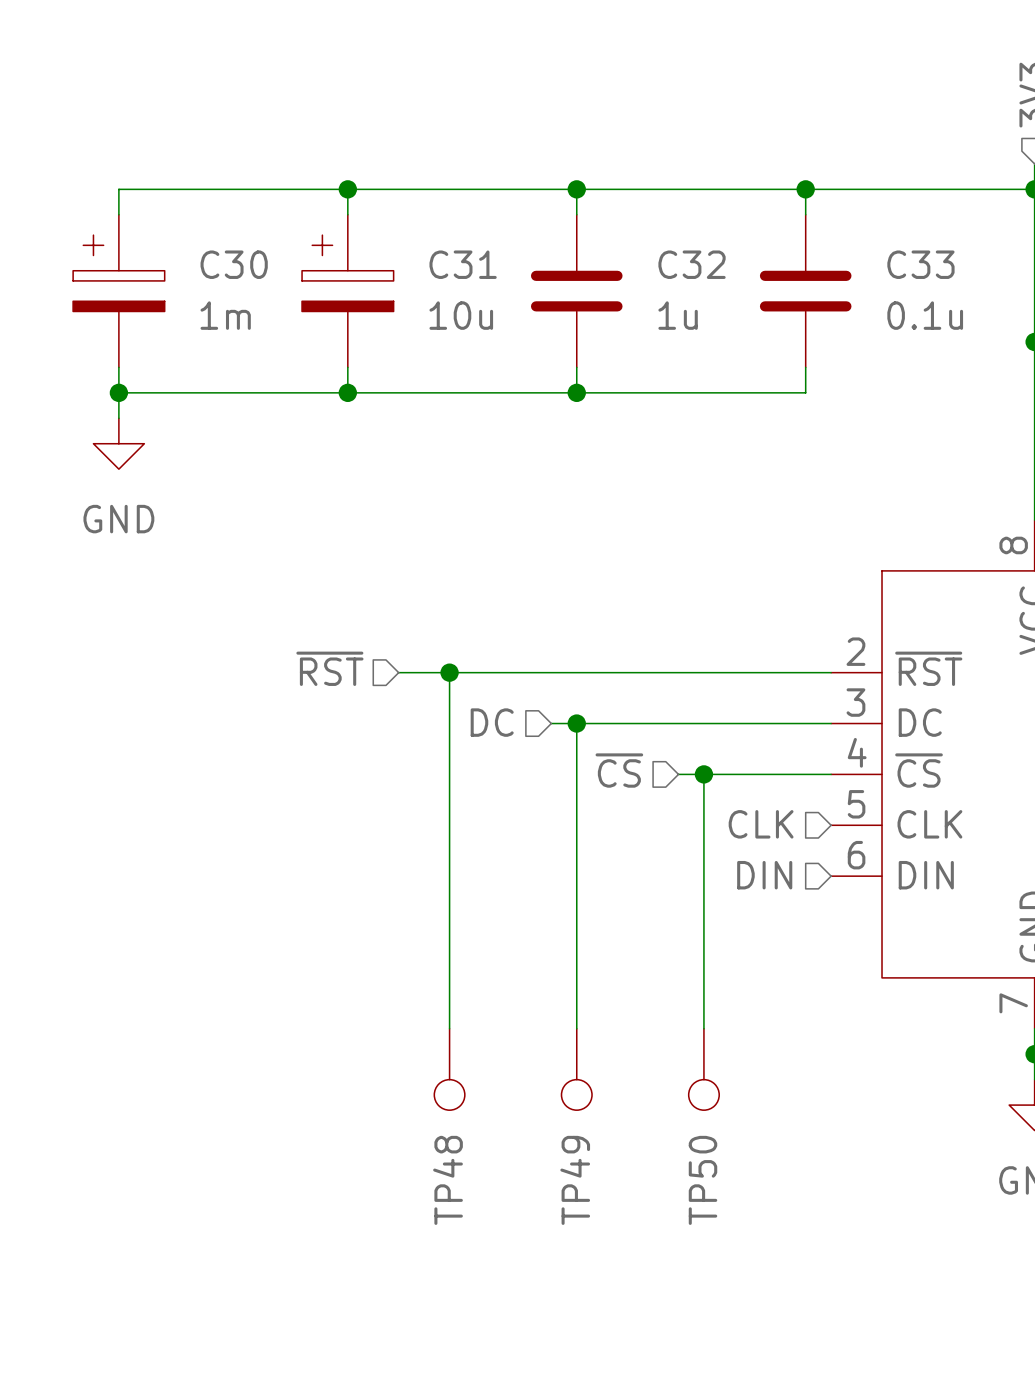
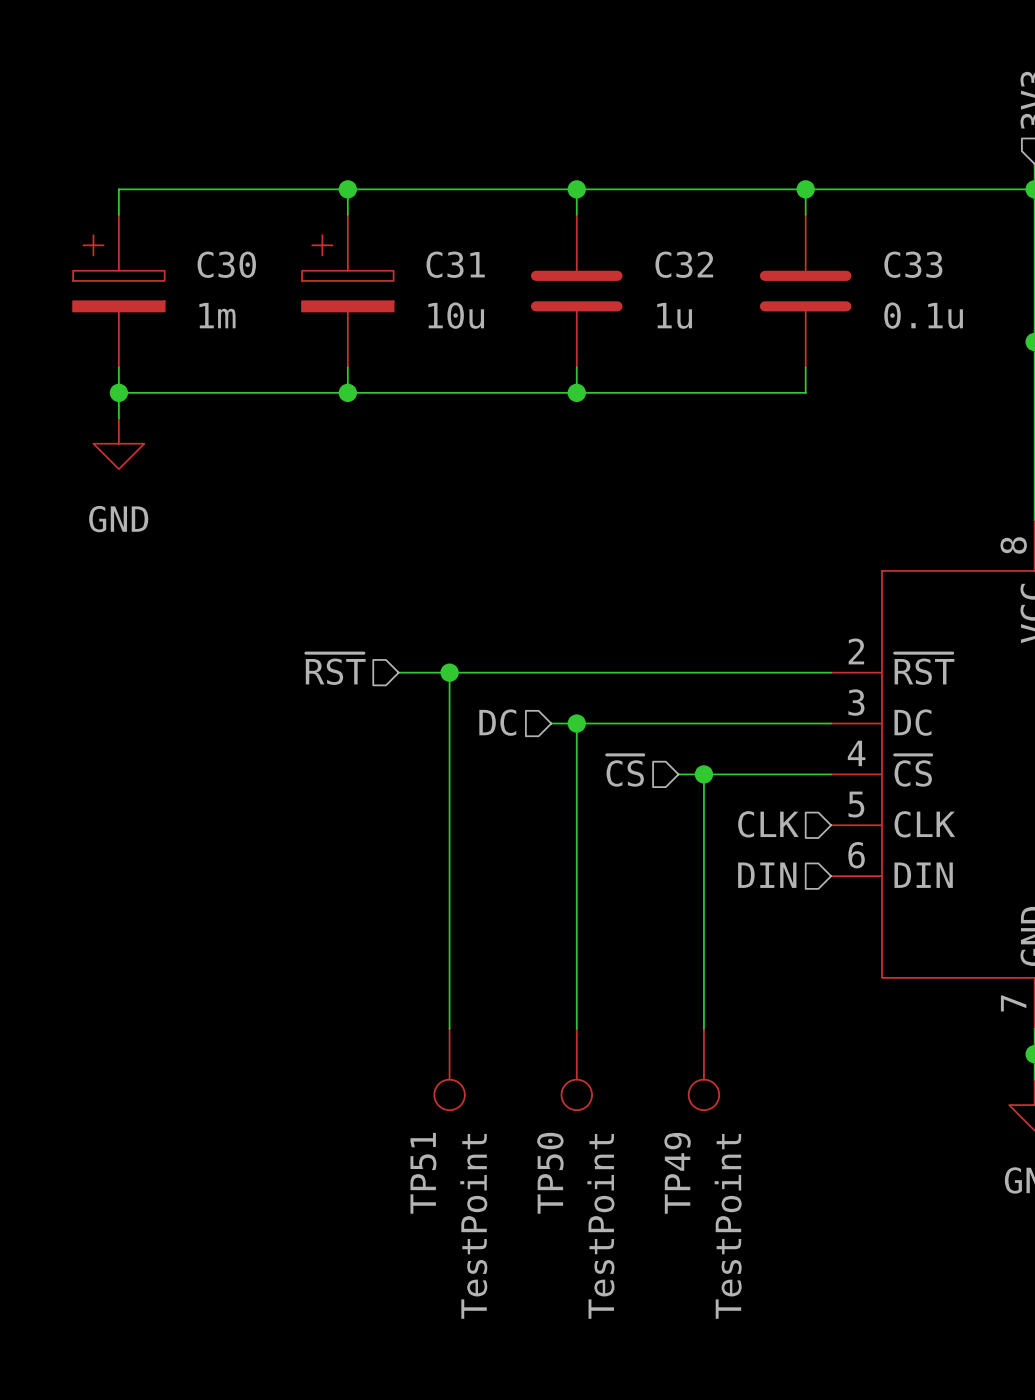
TP48 name: TP48 (448, 1180) -> TP51 (423, 1173)
TP49 name: TP49 (575, 1180) -> TP50 (550, 1173)
TP50 name: TP50 (702, 1180) -> TP49 (677, 1173)
TP48 value: none -> TestPoint (473, 1226)
TP49 value: none -> TestPoint (600, 1226)
TP50 value: none -> TestPoint (728, 1226)

